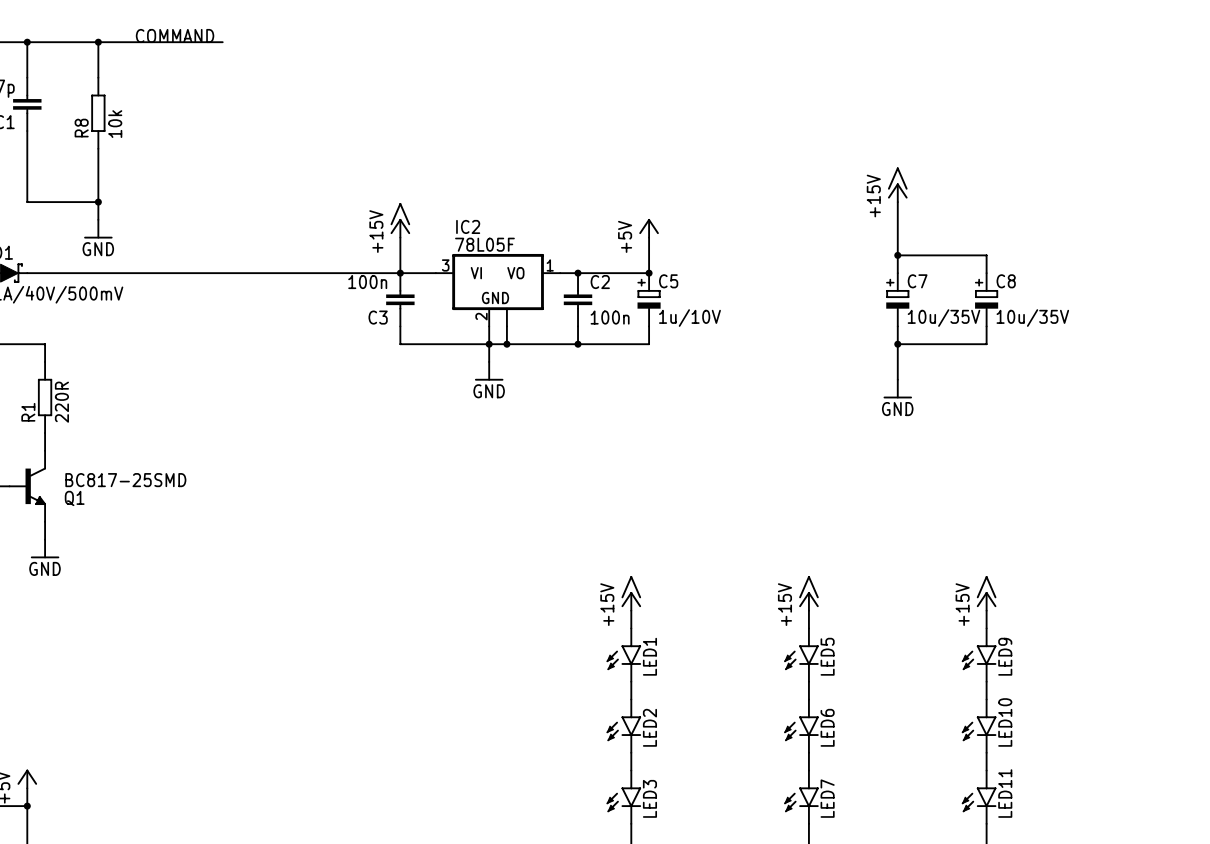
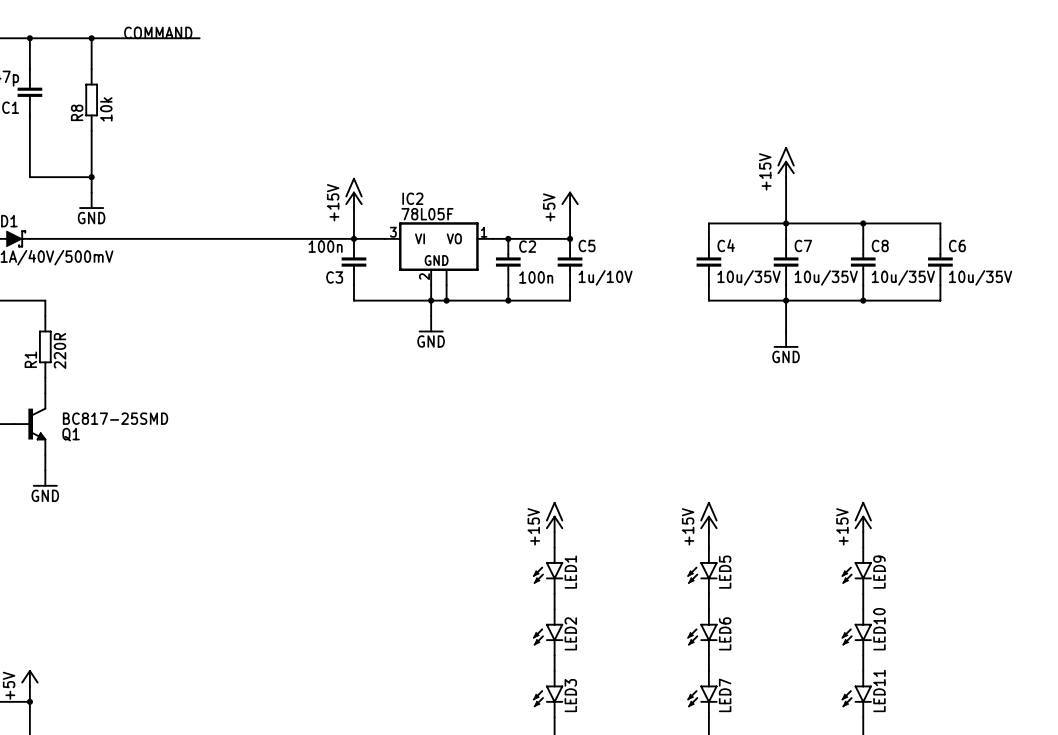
wire: none -> (786, 223) (708, 223) (708, 238)
wire: none -> (863, 223) (940, 223) (940, 238)
junction: none -> (863, 223)
C5 symbol: [637, 273, 661, 327] -> [557, 238, 583, 286]
C7 symbol: [886, 273, 910, 327] -> [773, 238, 799, 286]
C8 symbol: [975, 273, 999, 327] -> [850, 238, 876, 286]
C4: none -> 10u/35V (708, 262)
C6: none -> 10u/35V (940, 262)
wire: none -> (708, 285) (708, 300) (786, 300)
wire: none -> (940, 285) (940, 300) (863, 300)
junction: none -> (863, 300)

